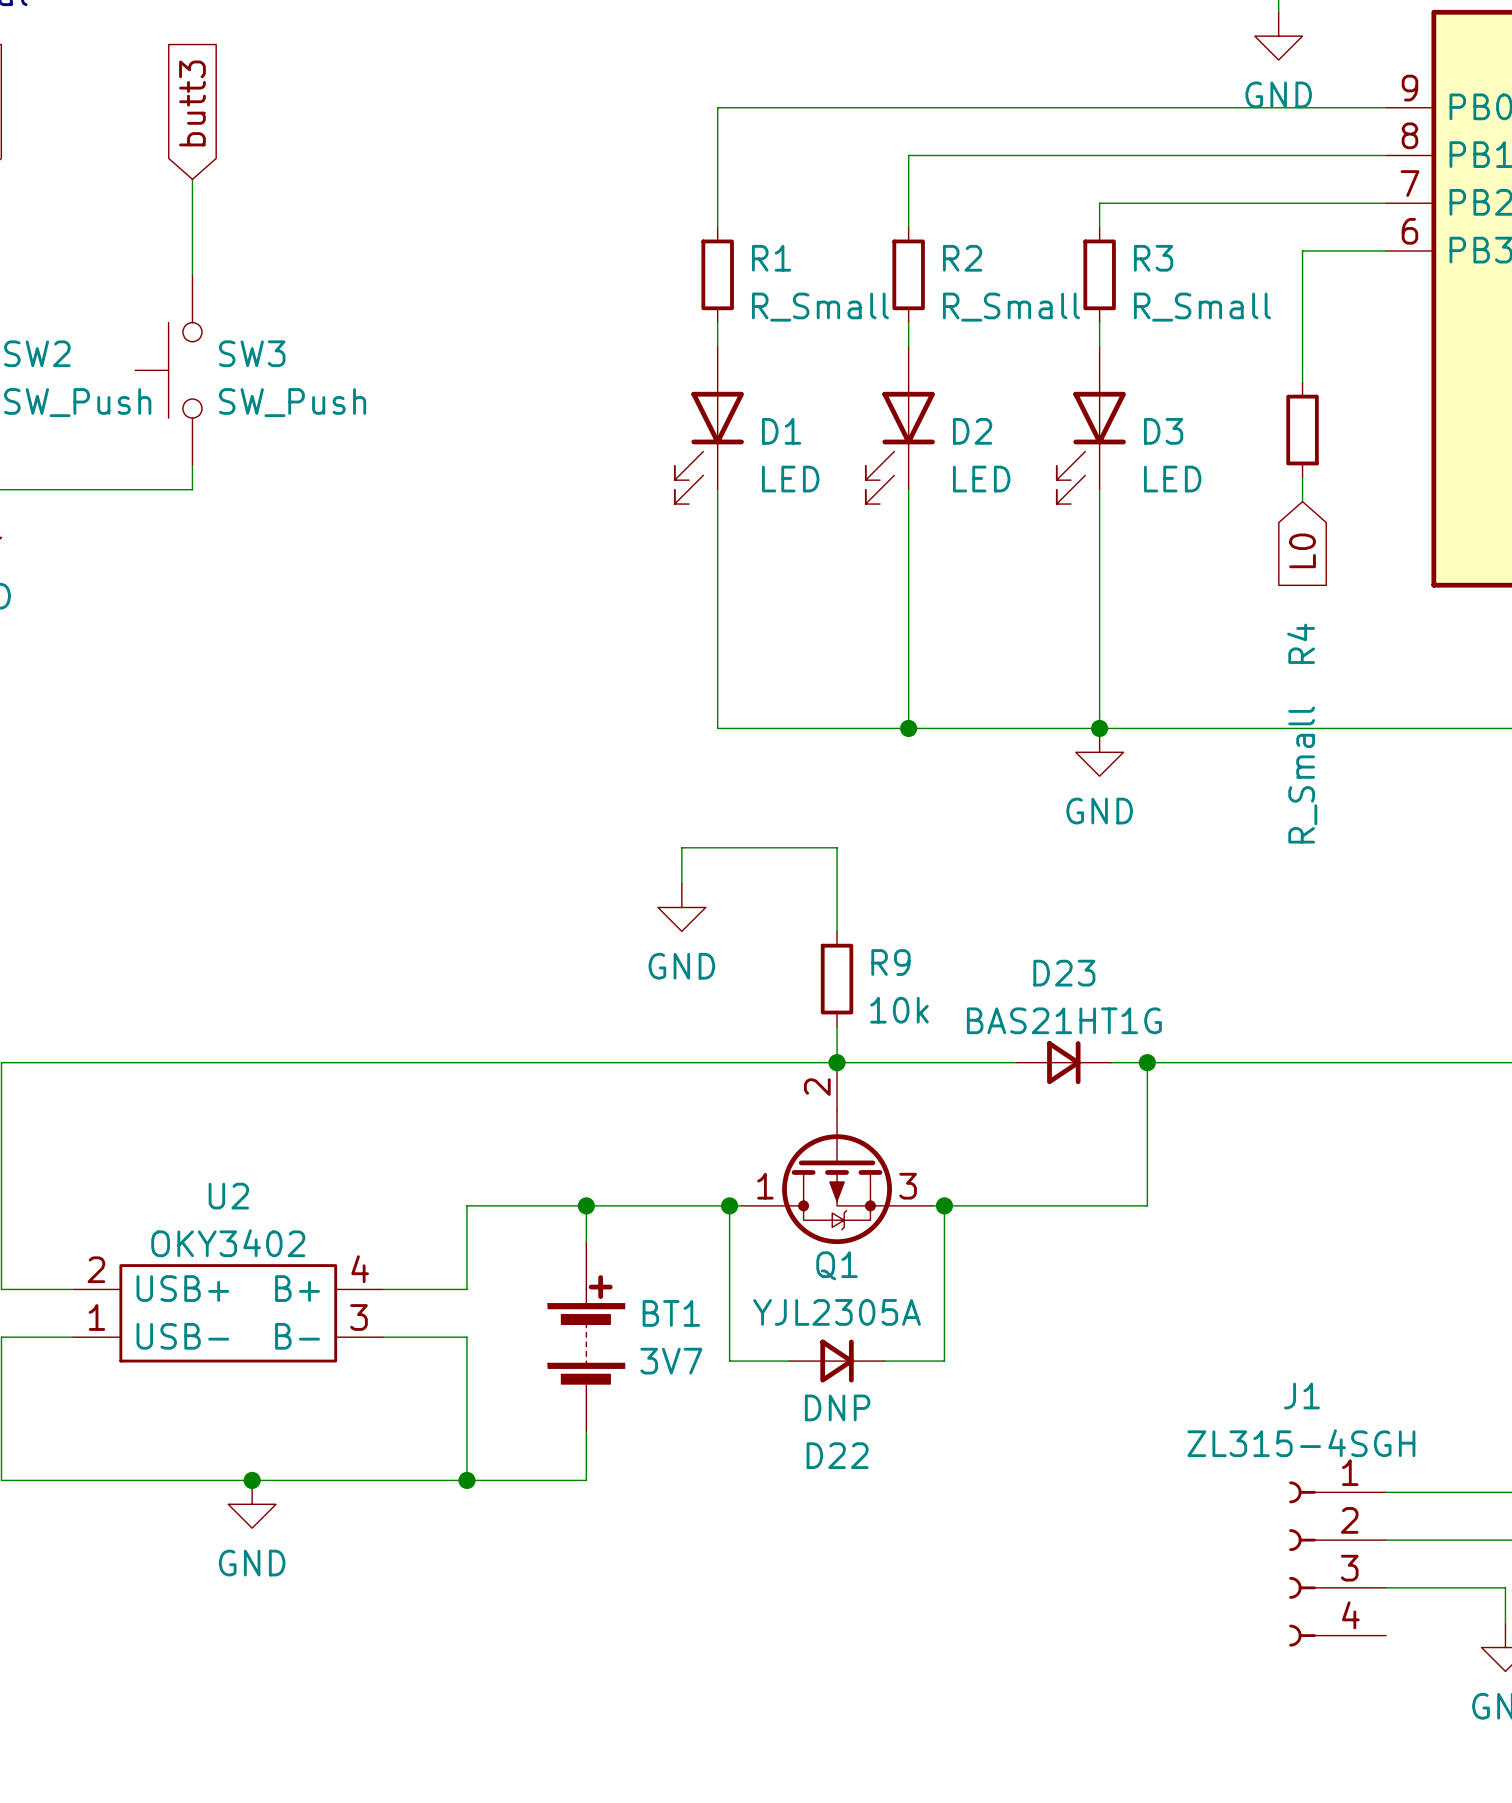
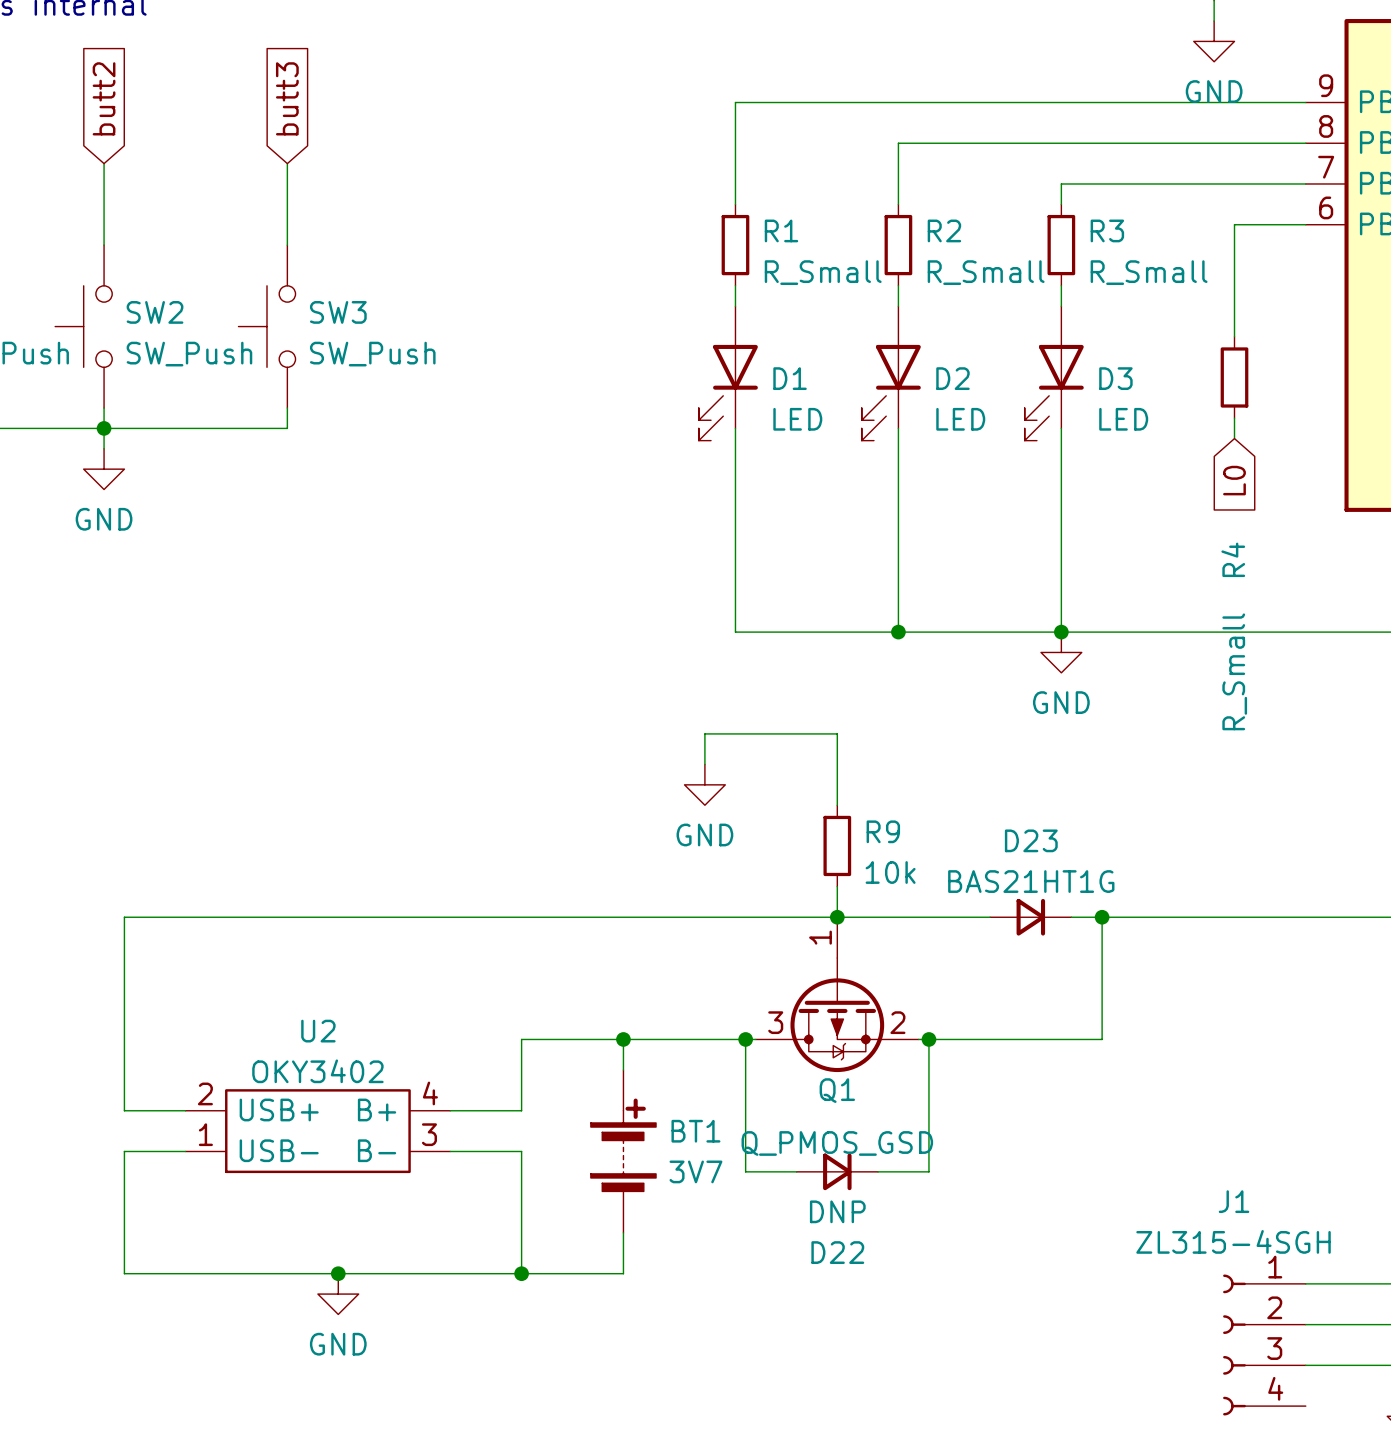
Q1 pin number: 2 (817, 1087) -> 1 (820, 937)
Q1 pin number: 1 (765, 1186) -> 3 (775, 1022)
Q1 pin number: 3 (908, 1186) -> 2 (897, 1022)
Q1 value: YJL2305A (837, 1312) -> Q_PMOS_GSD (837, 1143)

